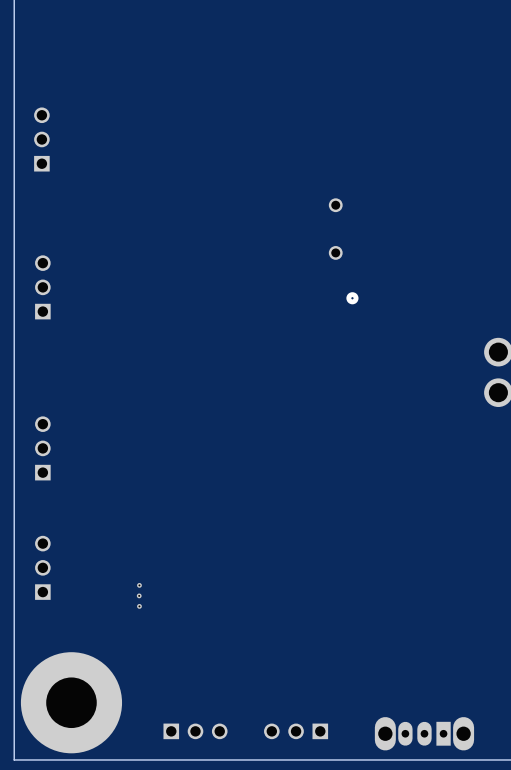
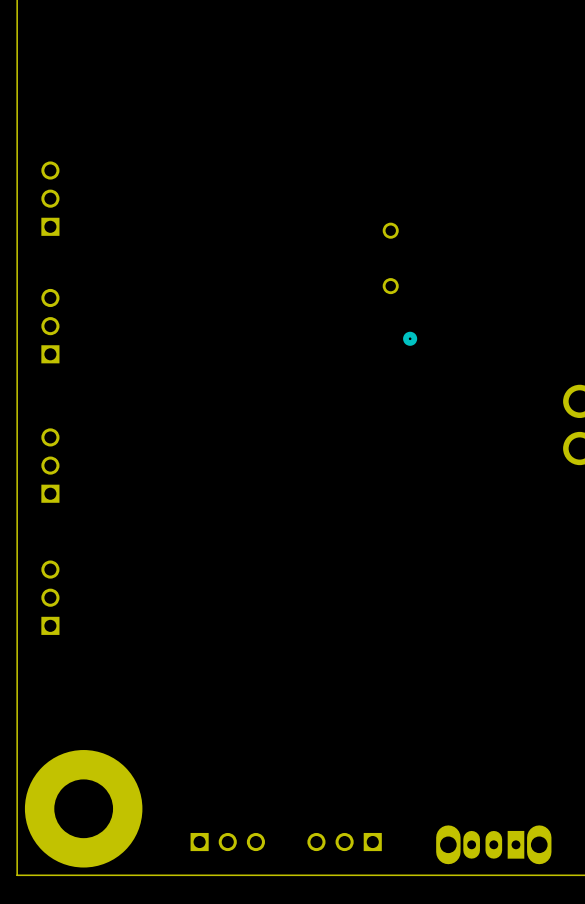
part position: (41, 139) -> (50, 198)
part: none -> (50, 465)
part: (42, 448) -> none
part: none -> (50, 597)
part: (42, 567) -> none
part: (139, 595) -> none

